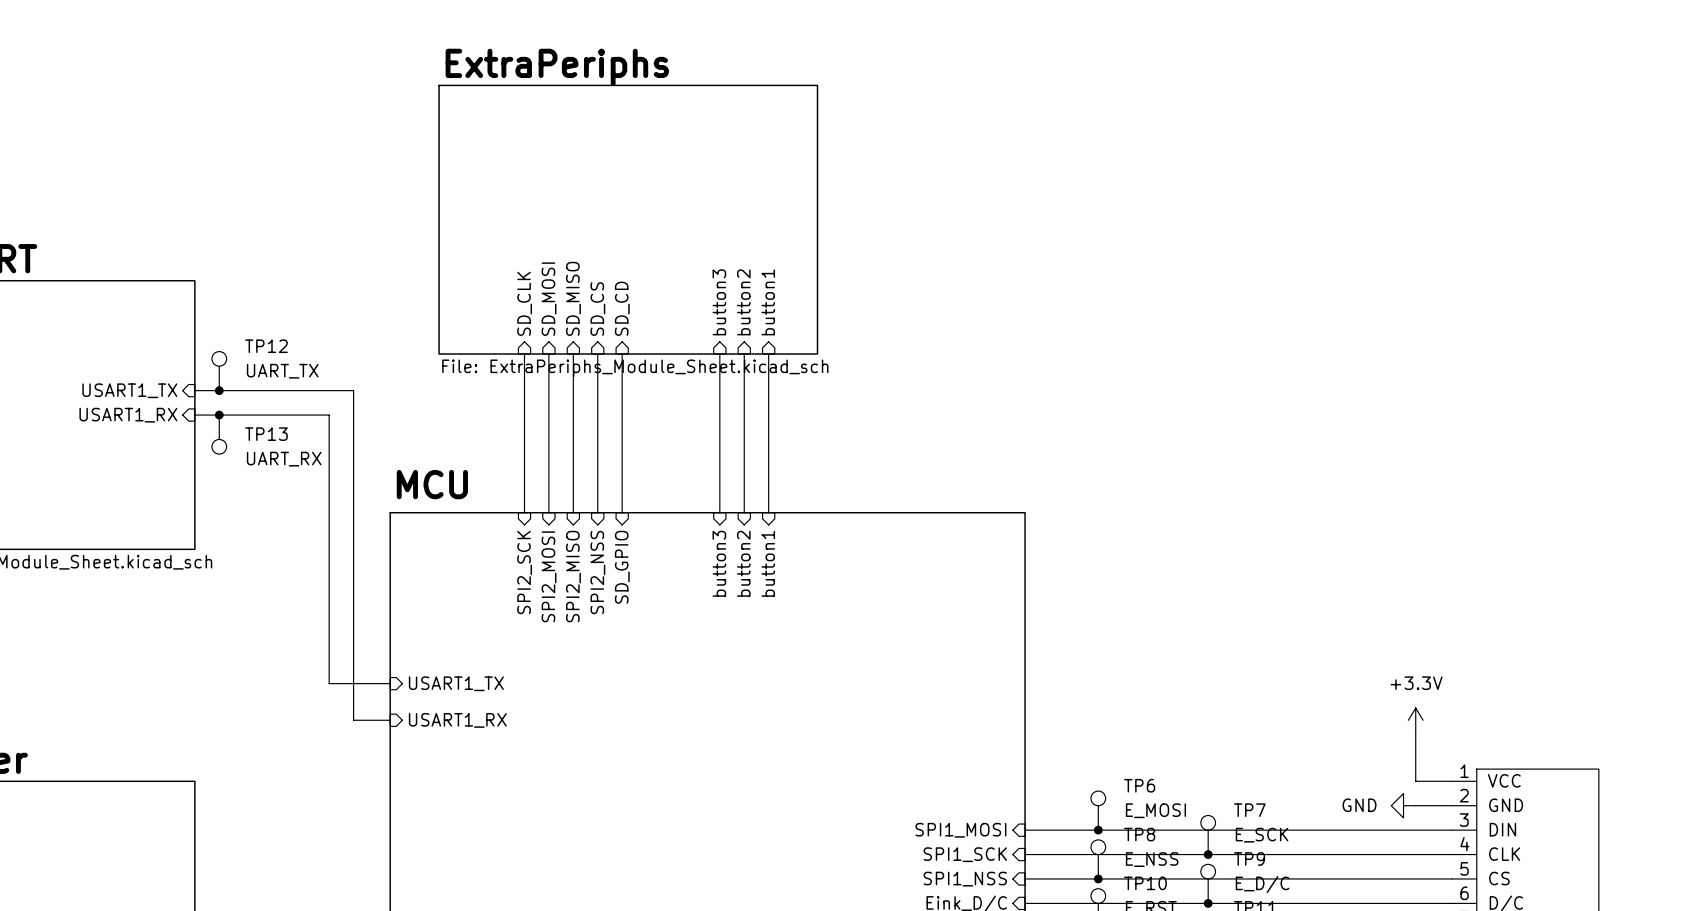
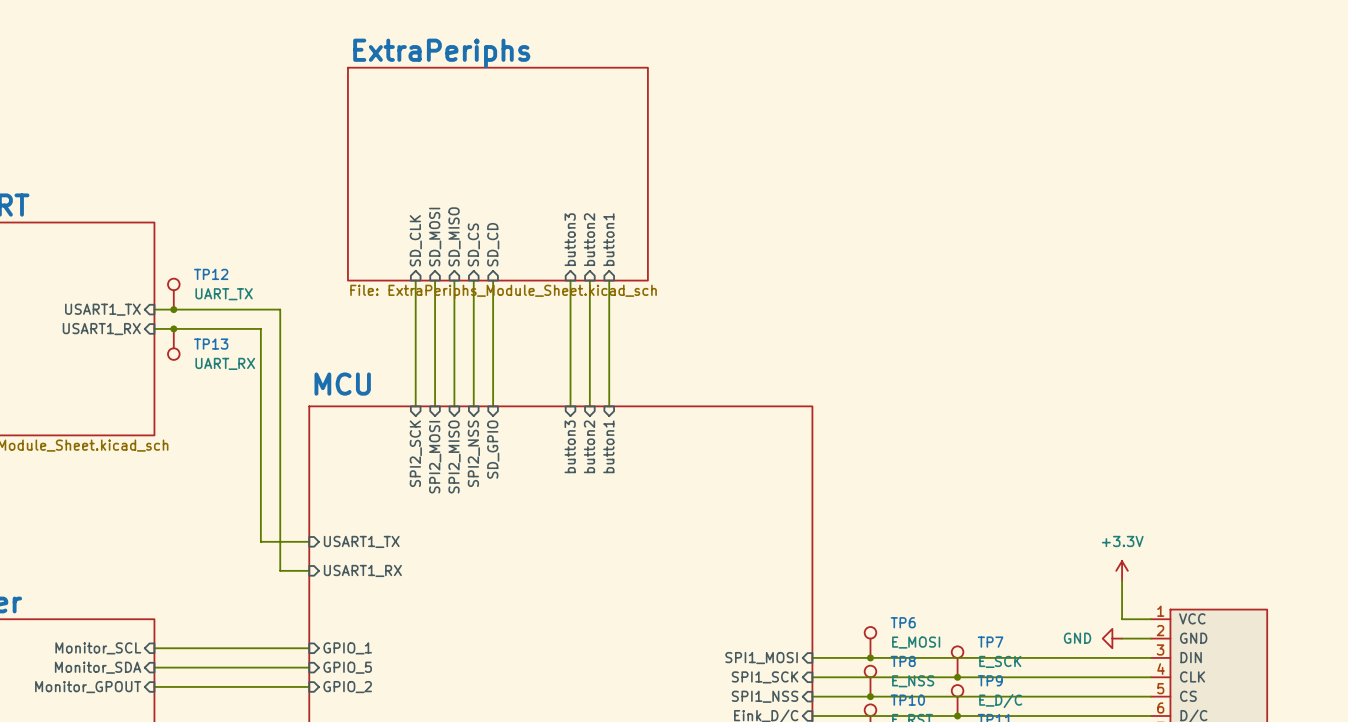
wire: none -> (154, 648) (309, 648)
sheet pin: none -> Monitor_SCL (98, 648)
sheet pin: none -> GPIO_1 (347, 648)
sheet pin: none -> Monitor_SDA (98, 667)
wire: none -> (154, 667) (309, 667)
sheet pin: none -> GPIO_5 (347, 667)
sheet pin: none -> Monitor_GPOUT (88, 687)
wire: none -> (154, 686) (309, 686)
sheet pin: none -> GPIO_2 (347, 687)

